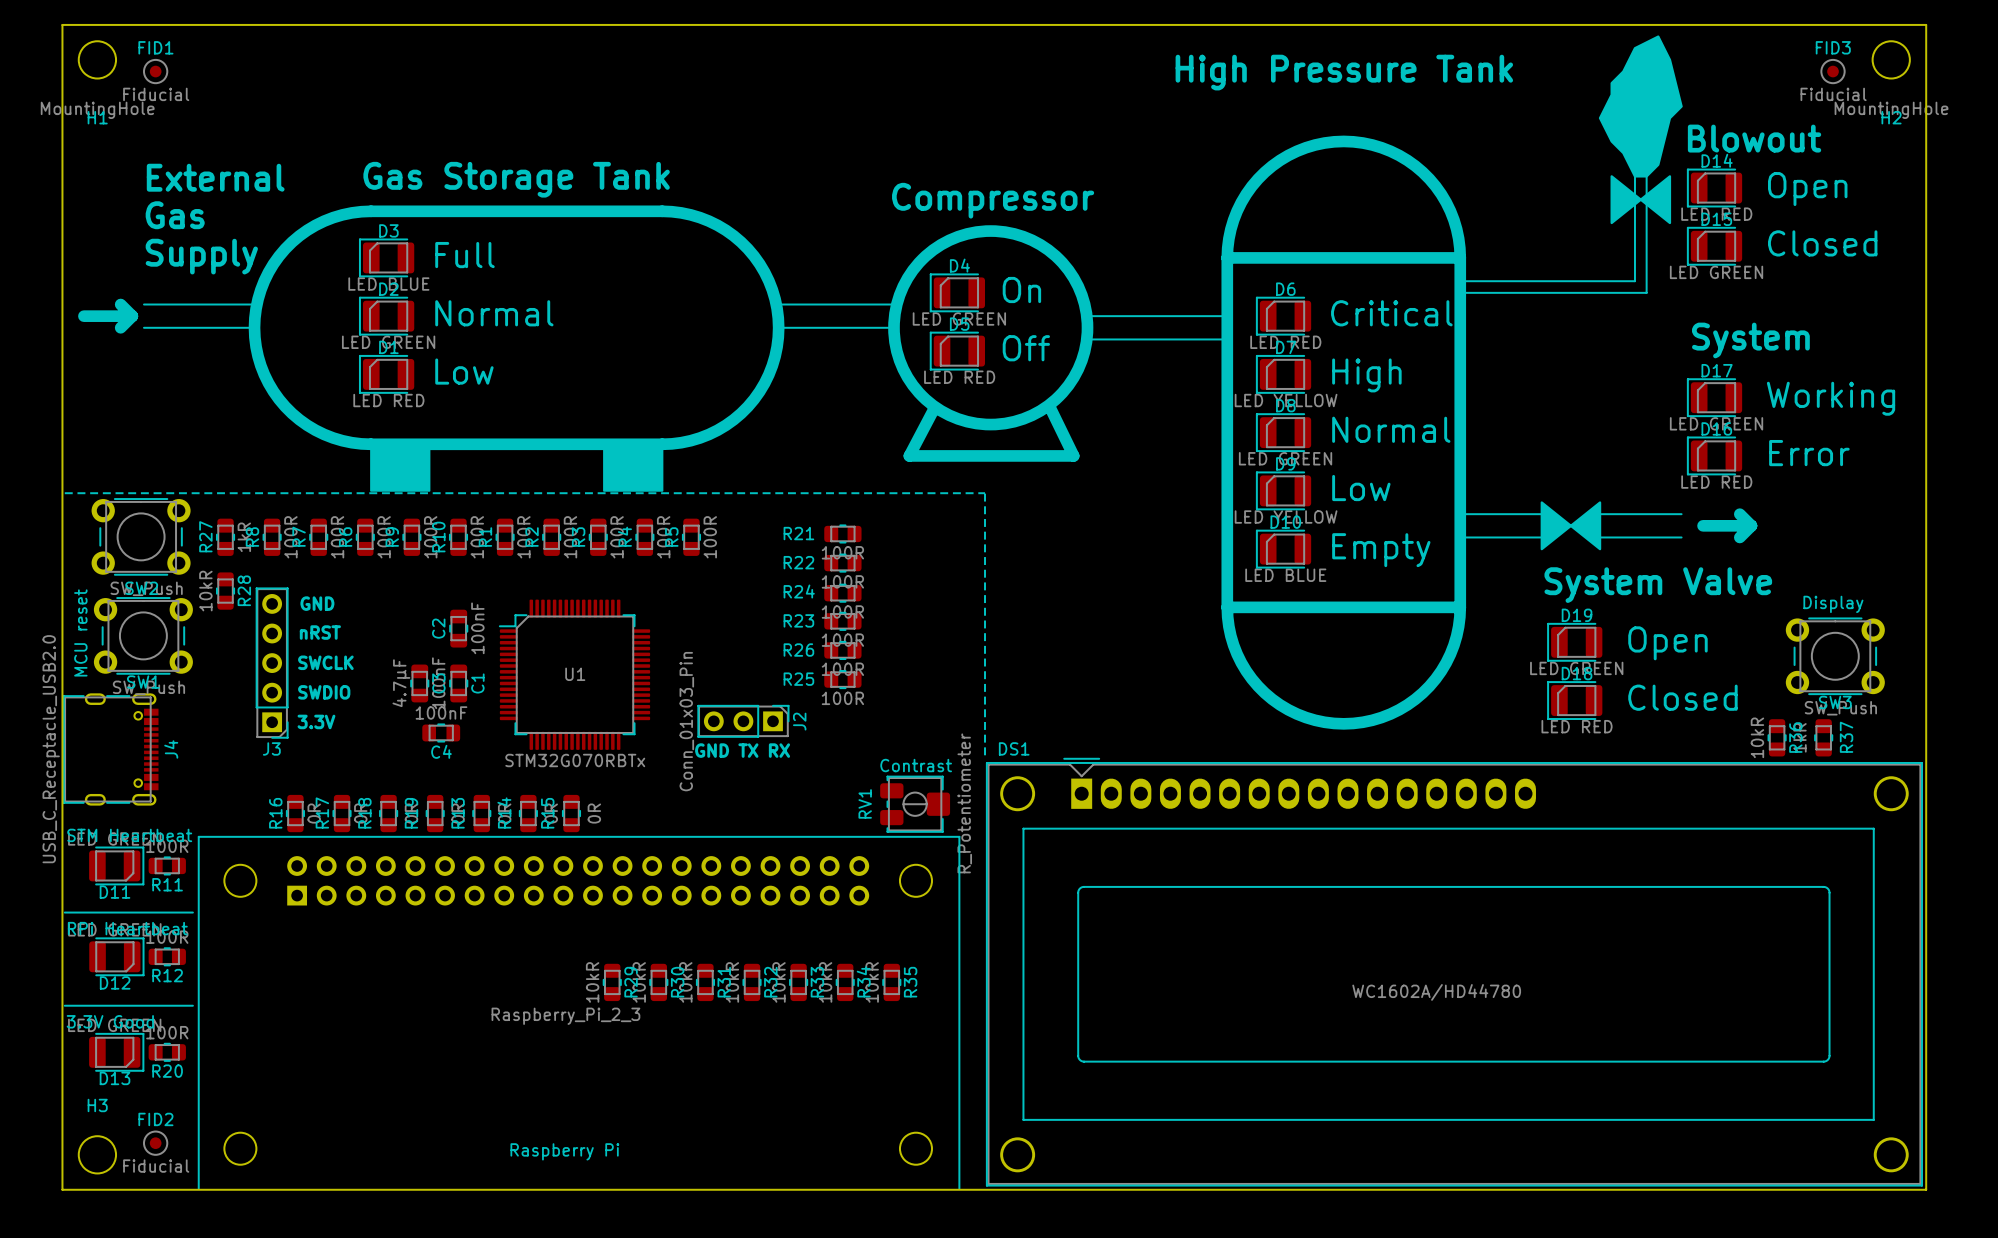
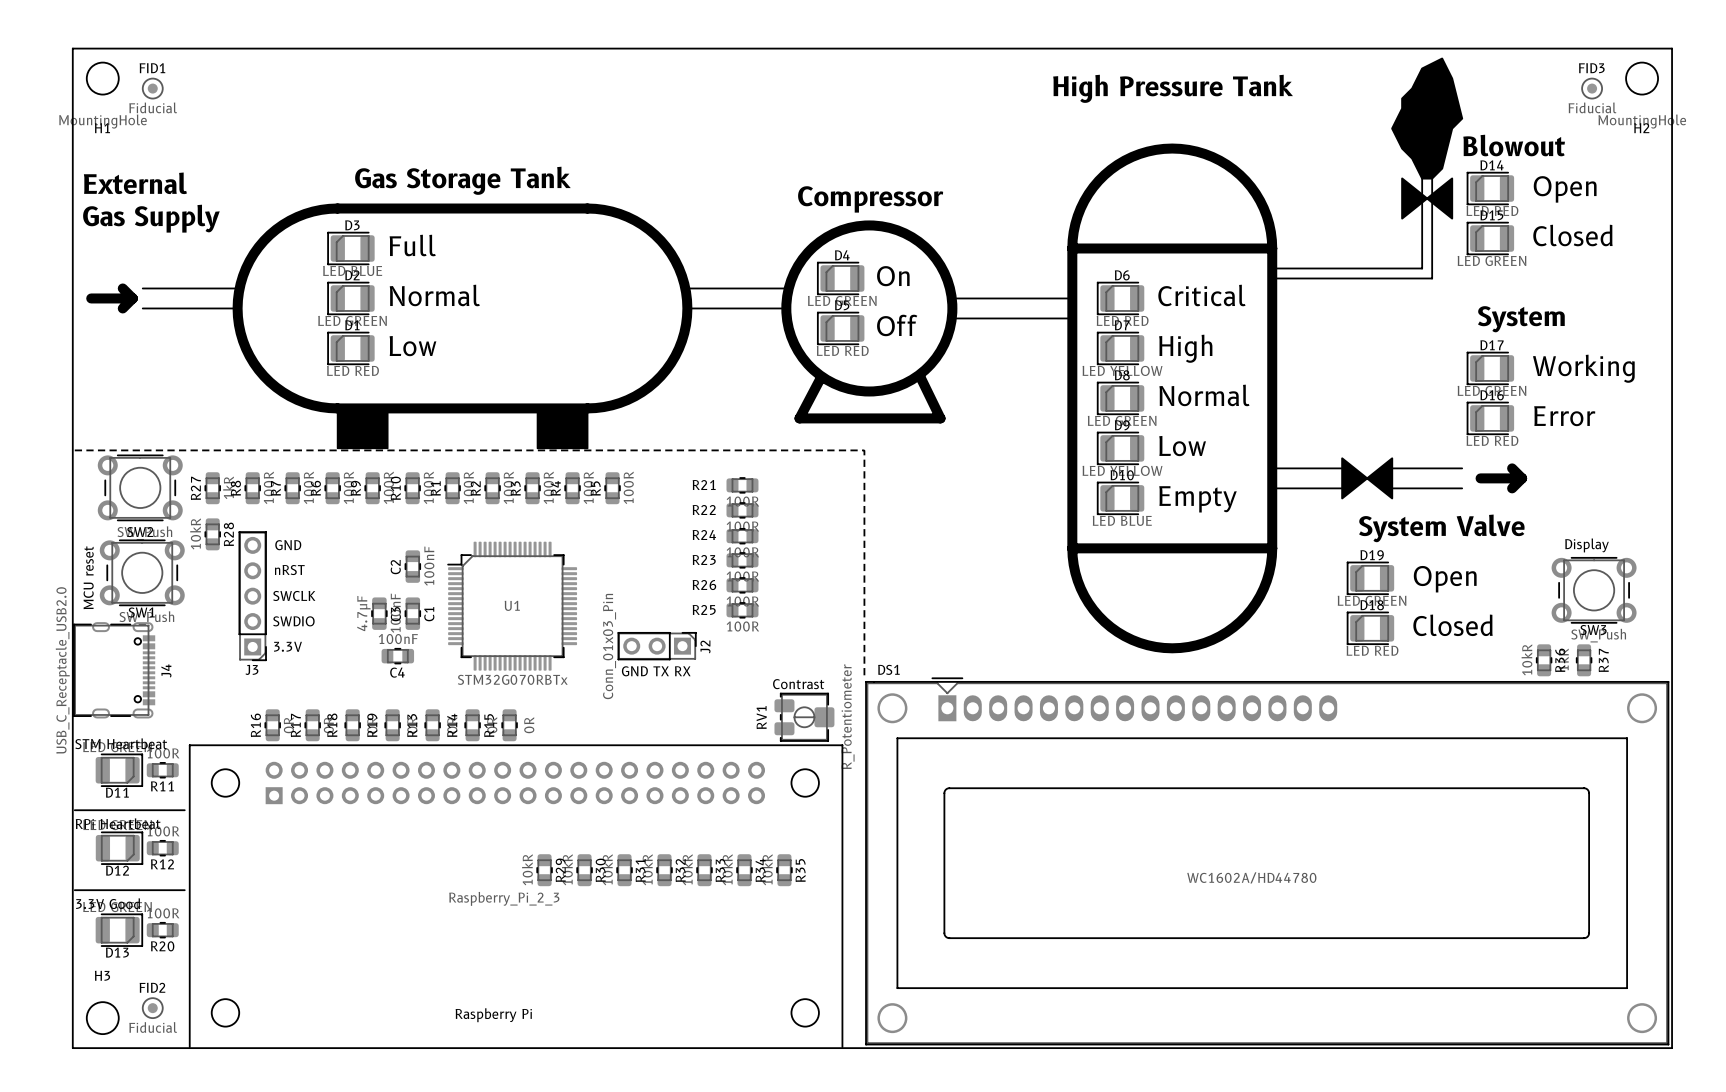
text position: External (215, 177) -> External (135, 183)
text: Gas (175, 215) -> none
text: Supply (201, 256) -> Gas Supply (151, 218)

